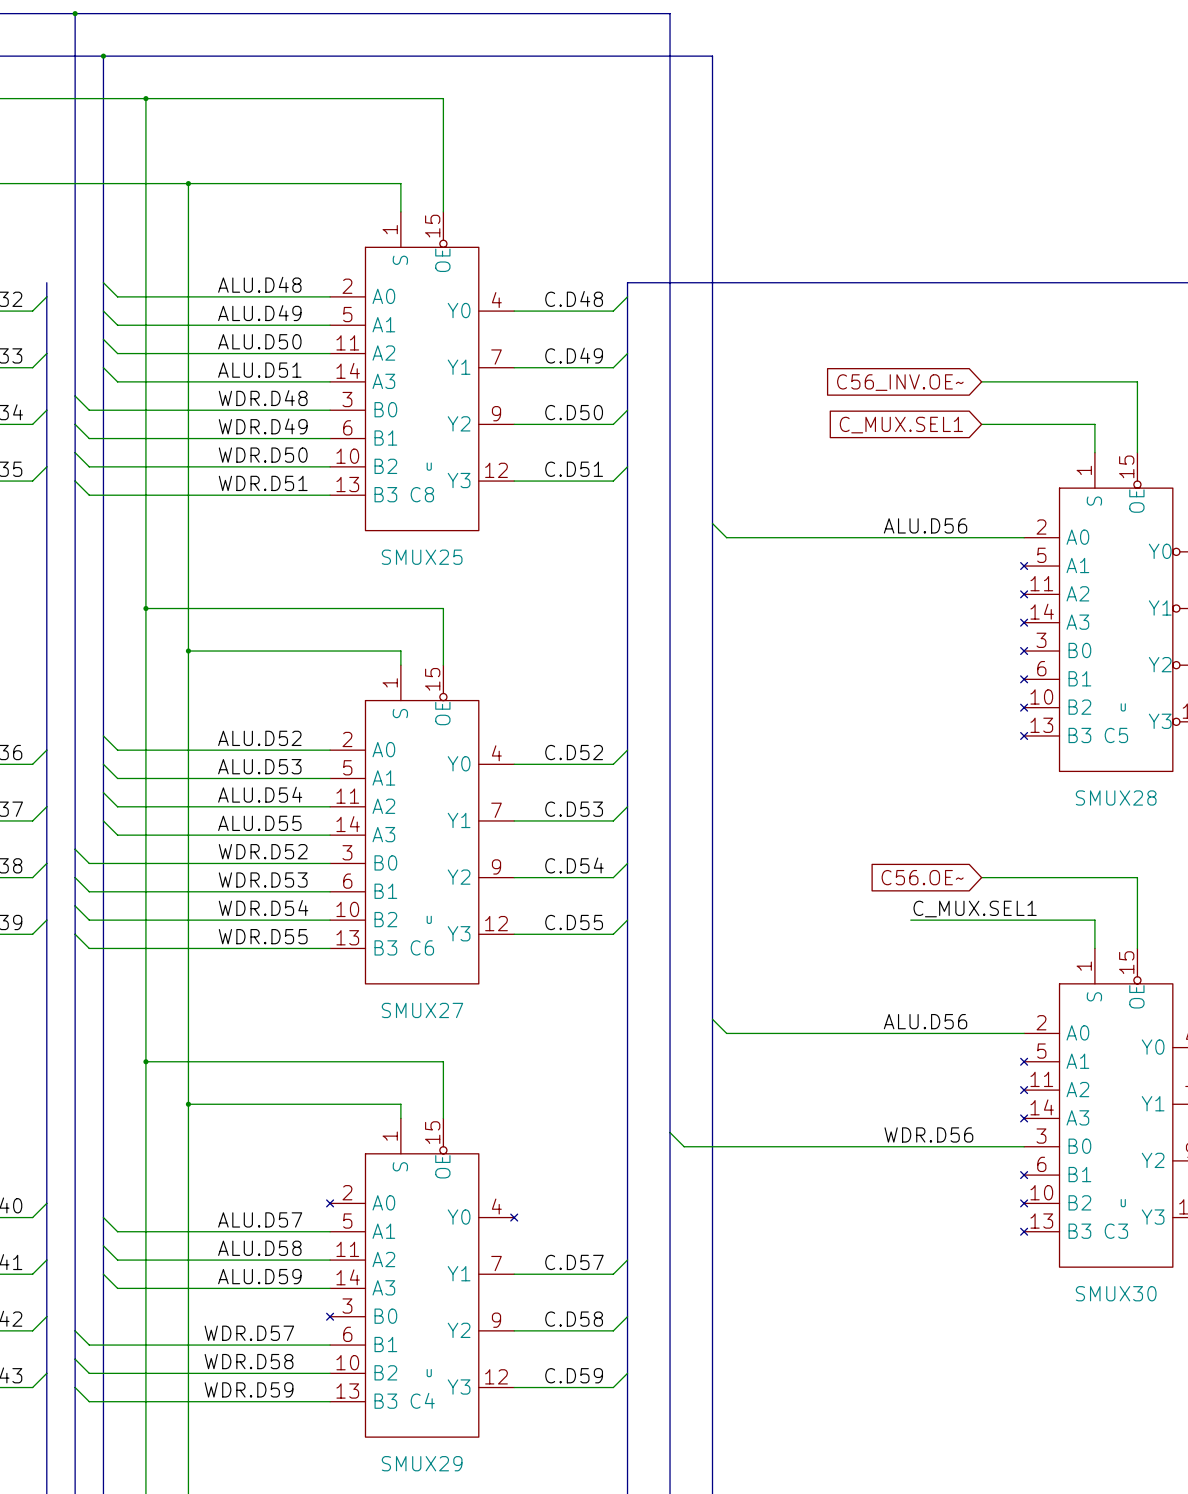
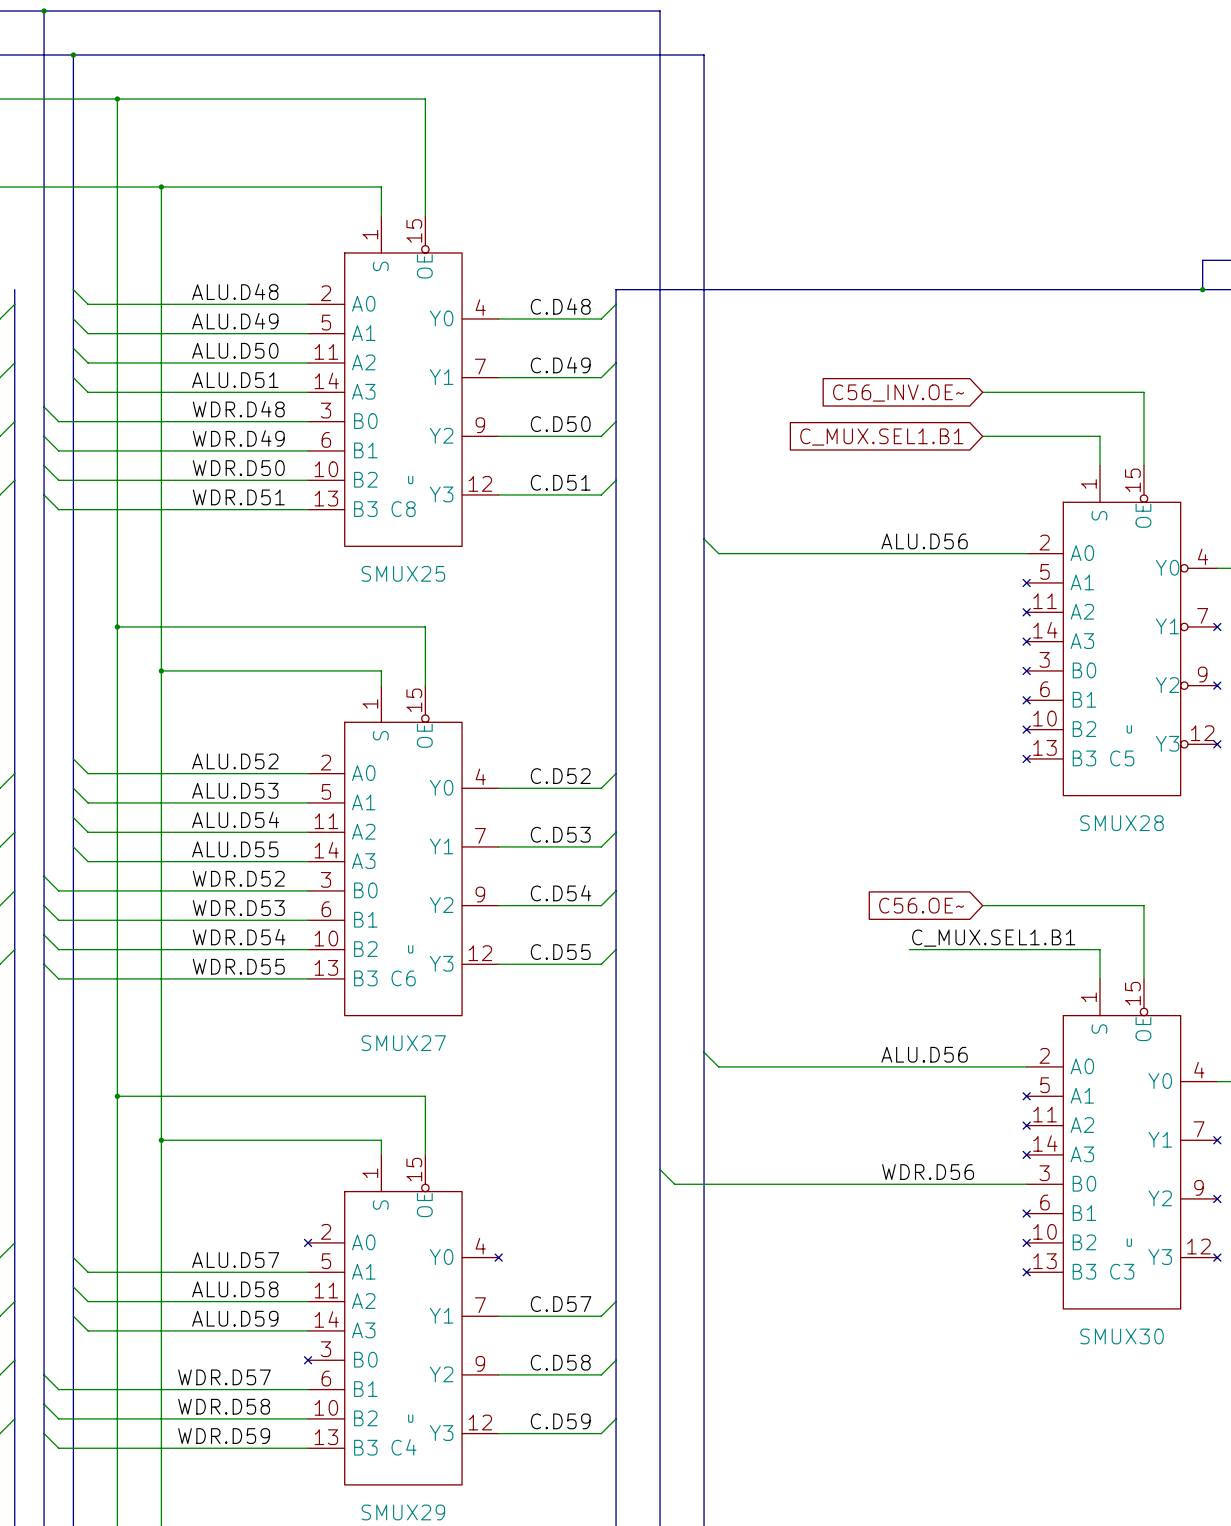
global label: C_MUX.SEL1 (901, 425) -> C_MUX.SEL1.B1 (881, 437)
label: C_MUX.SEL1 (975, 909) -> C_MUX.SEL1.B1 (993, 938)

